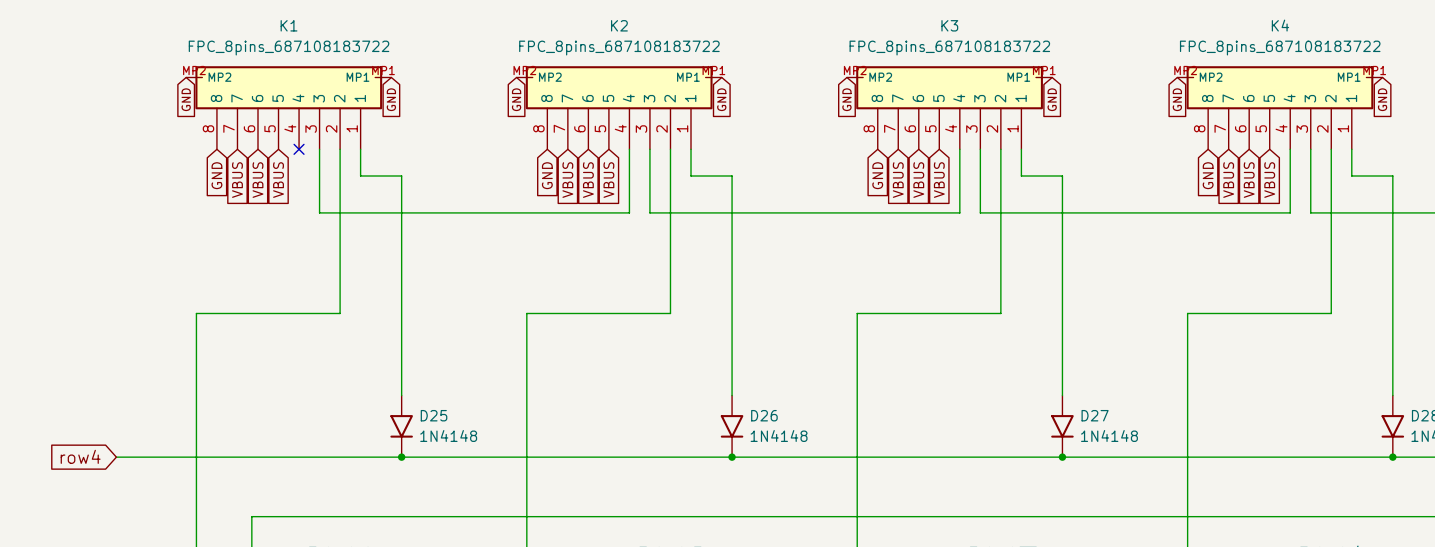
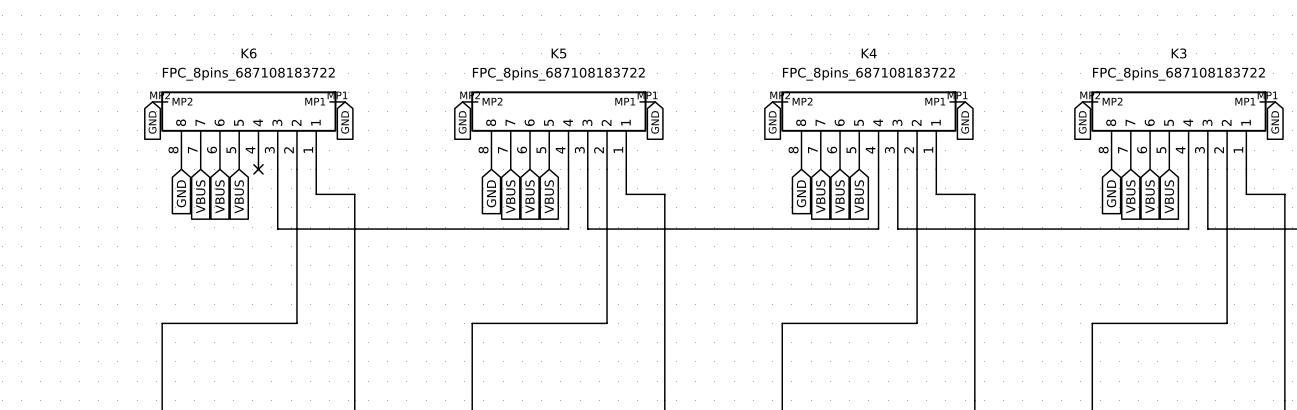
K1 name: K1 (289, 25) -> K6 (249, 53)
K2 name: K2 (619, 25) -> K5 (558, 53)
K3 name: K3 (949, 25) -> K4 (869, 53)
K4 name: K4 (1280, 25) -> K3 (1179, 53)

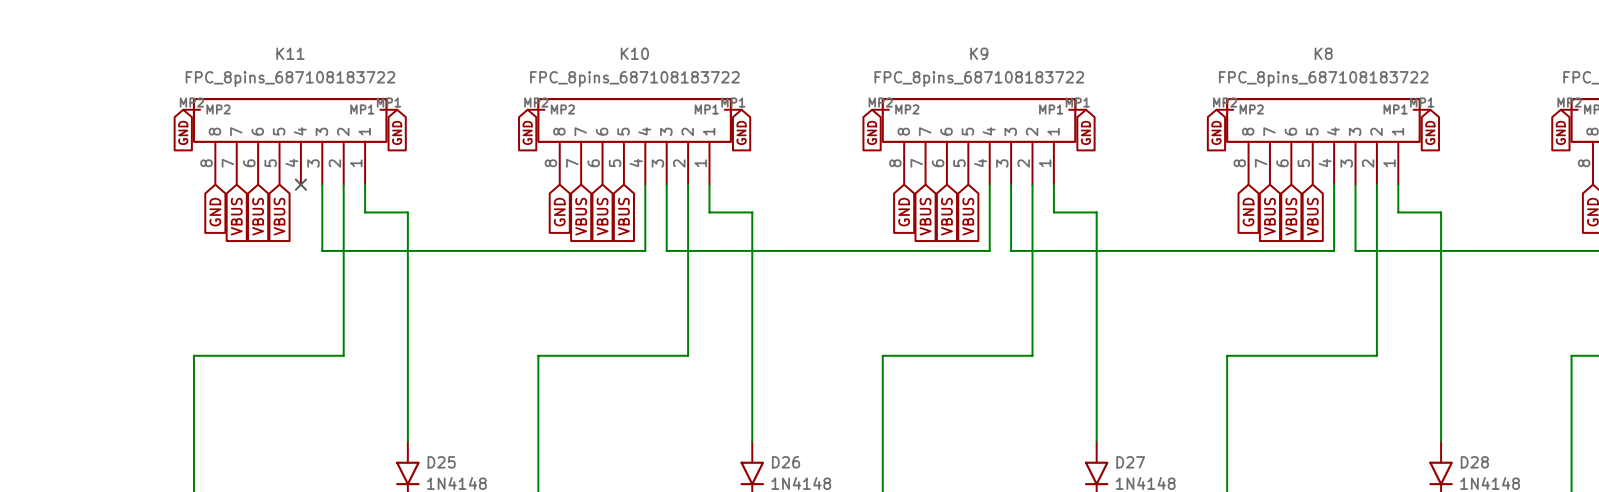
K6 name: K6 (249, 53) -> K11 (290, 53)
K5 name: K5 (558, 53) -> K10 (634, 53)
K4 name: K4 (869, 53) -> K9 (979, 53)
K3 name: K3 (1179, 53) -> K8 (1323, 53)

